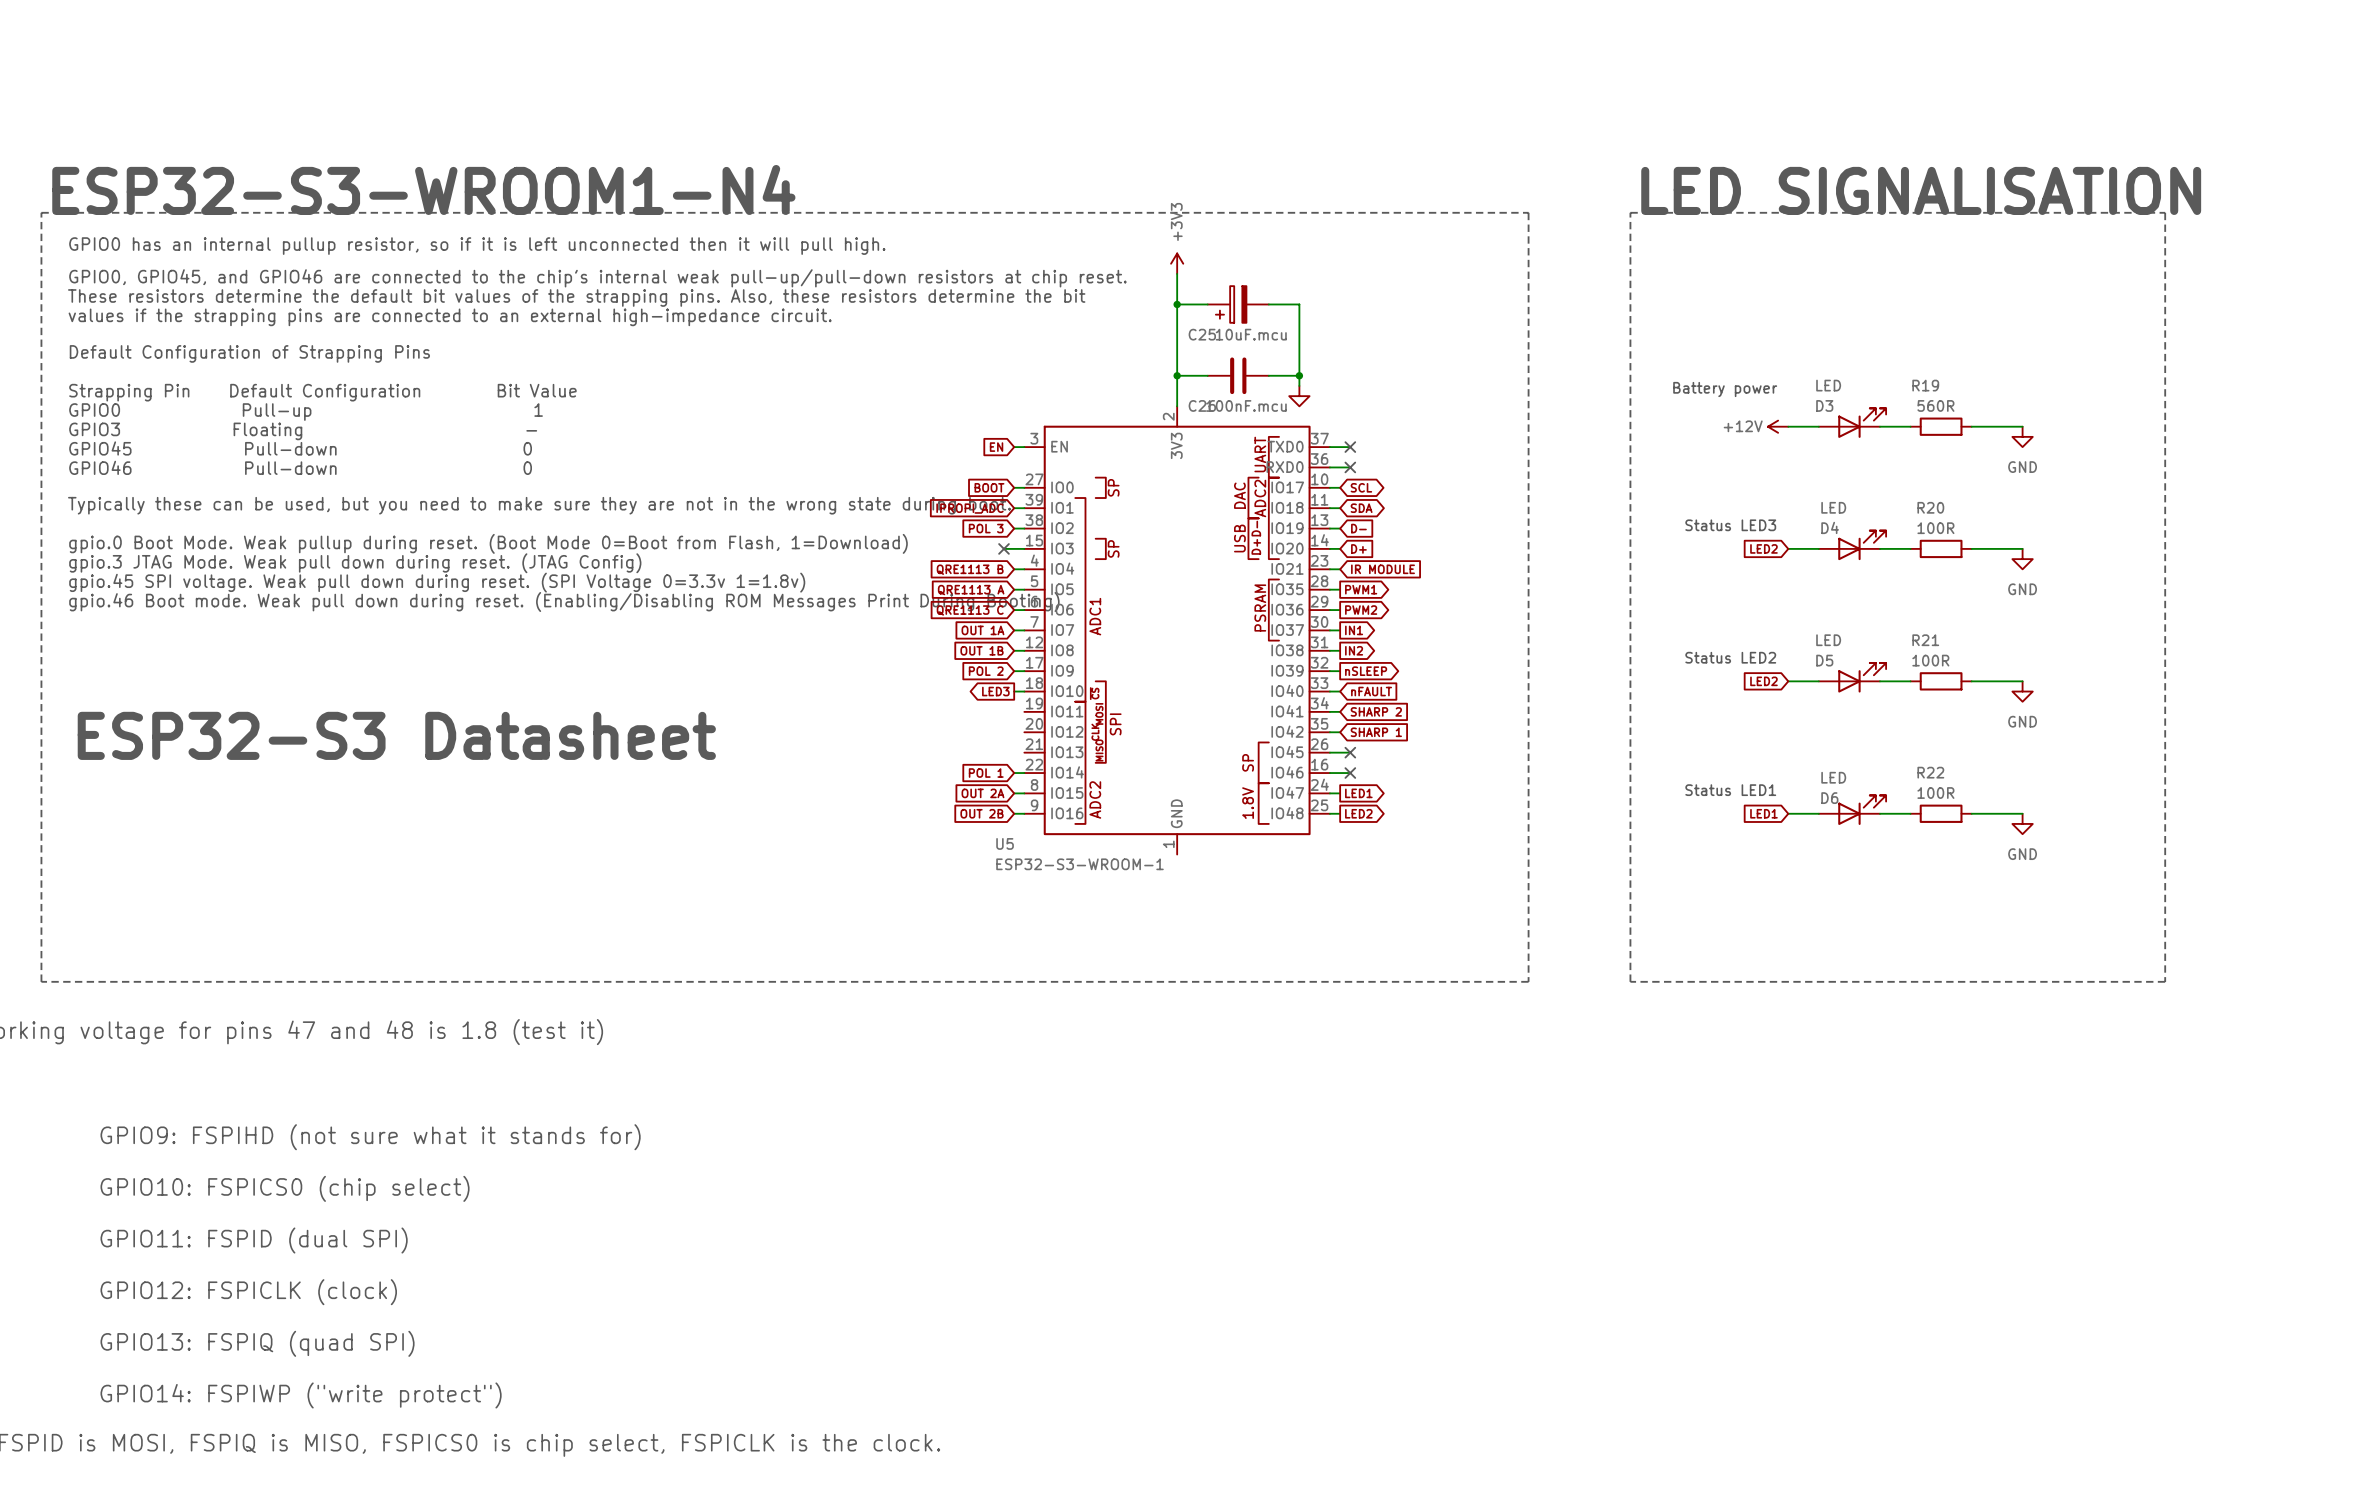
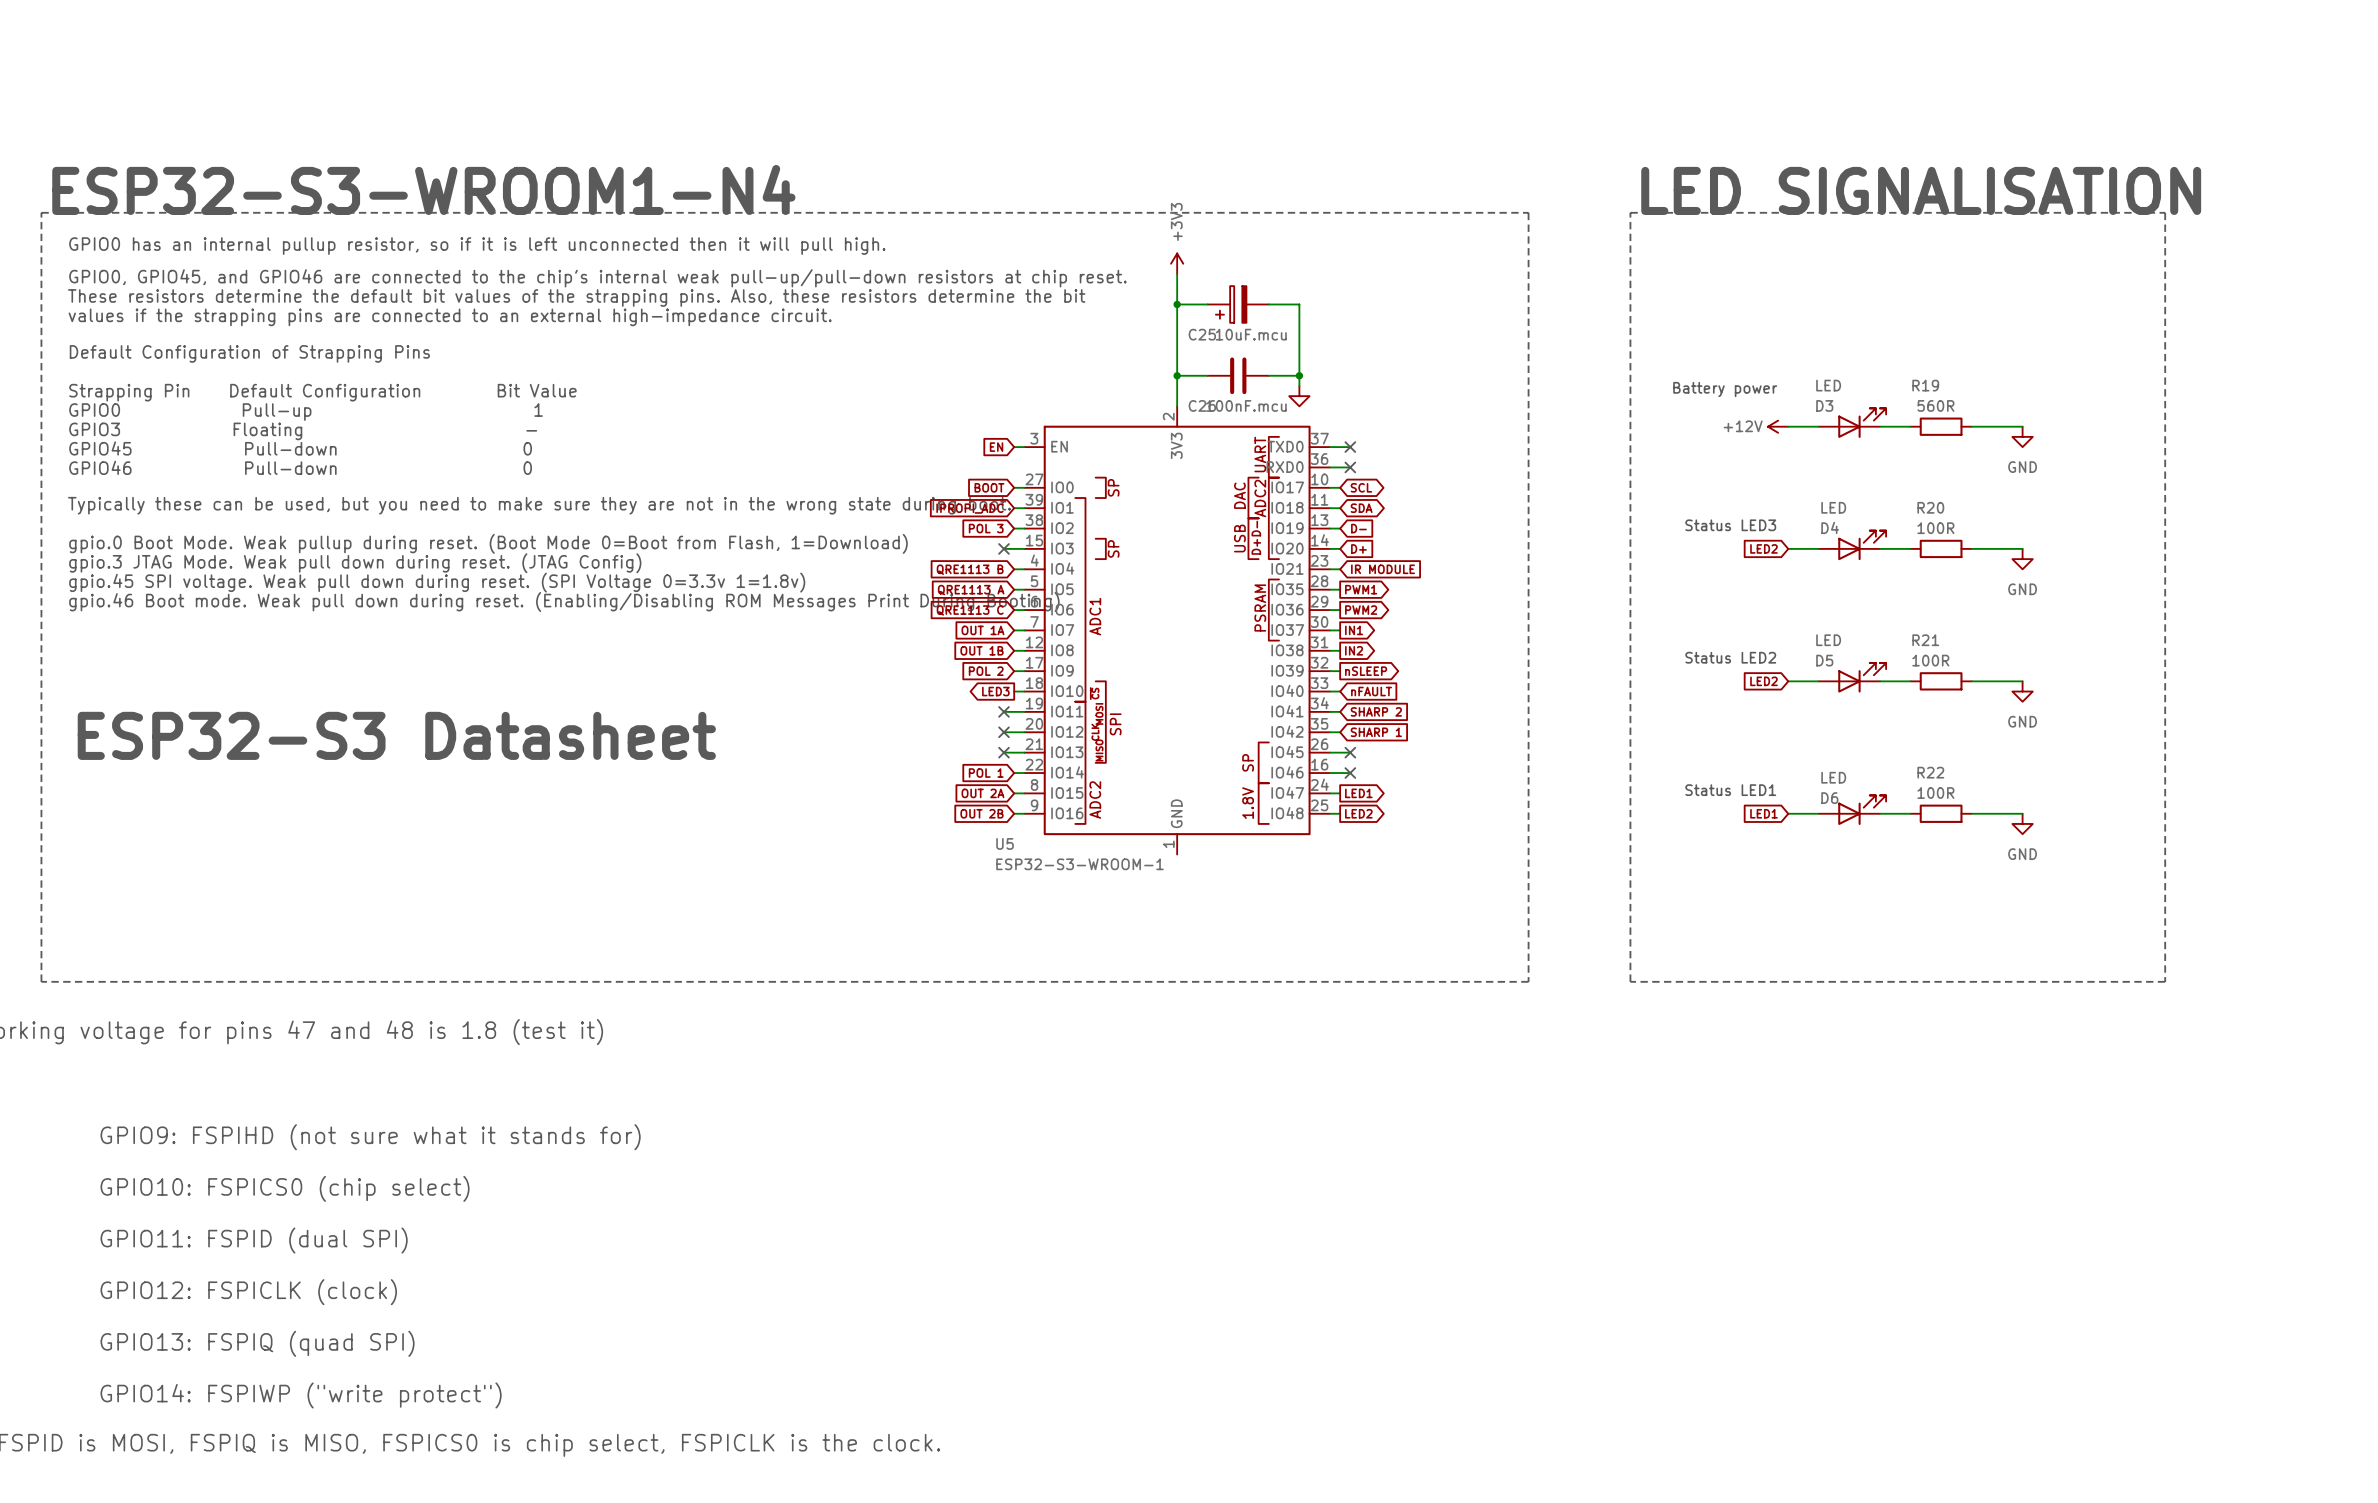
wire: none -> (1004, 711) (1024, 711)
no-connect mark: none -> (1004, 711)
wire: none -> (1004, 732) (1024, 732)
no-connect mark: none -> (1004, 732)
wire: none -> (1004, 752) (1024, 752)
no-connect mark: none -> (1004, 752)

